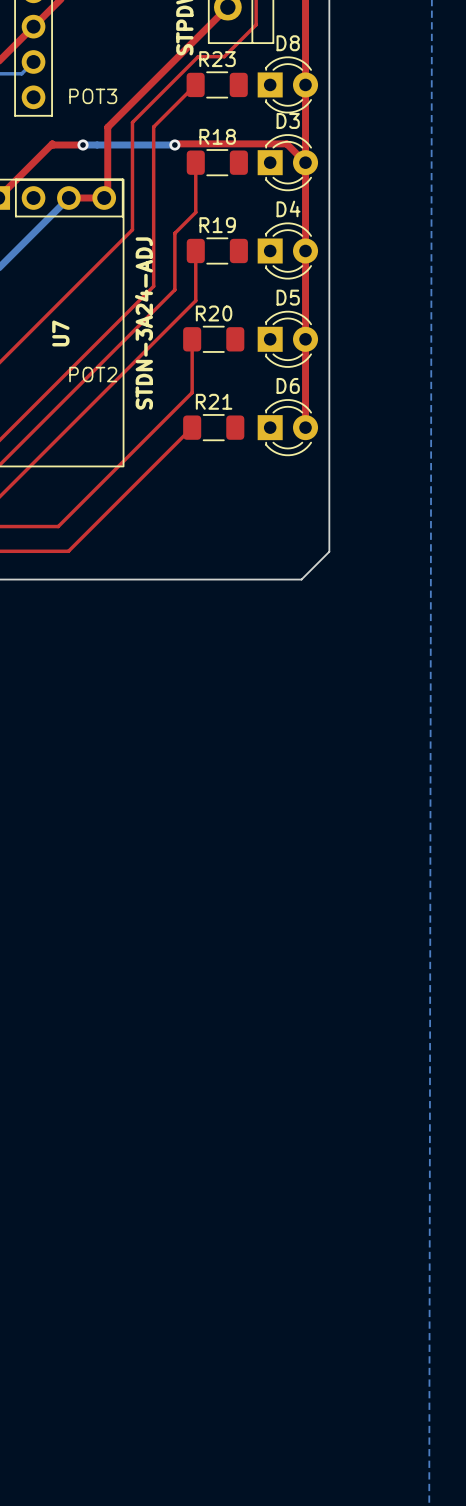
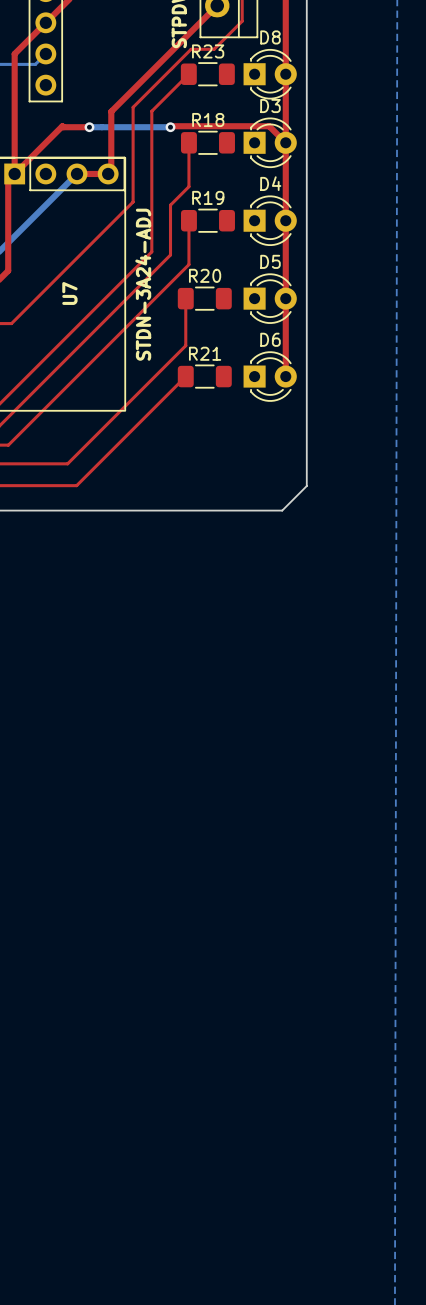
POT3: (93, 96) -> none
POT2: (93, 374) -> none

